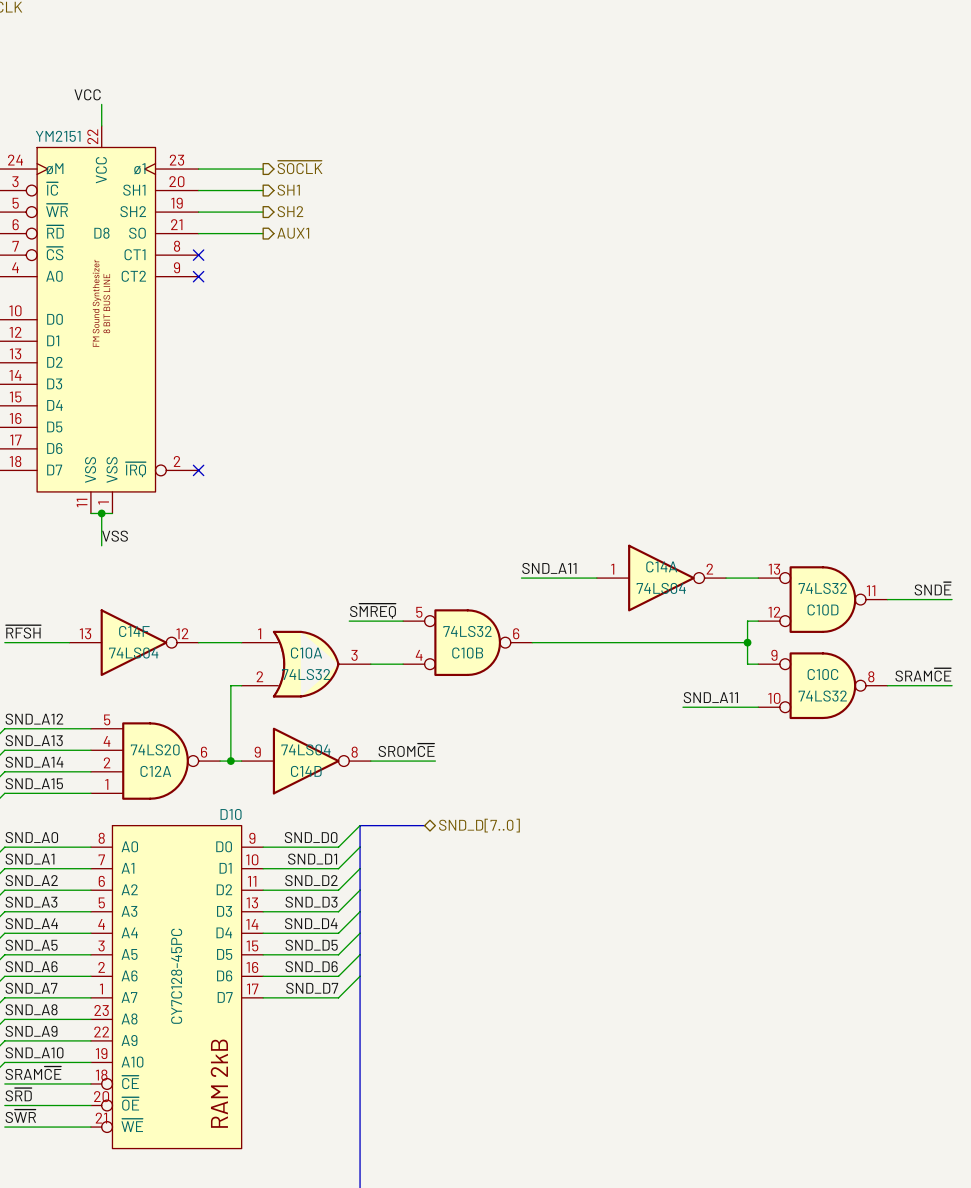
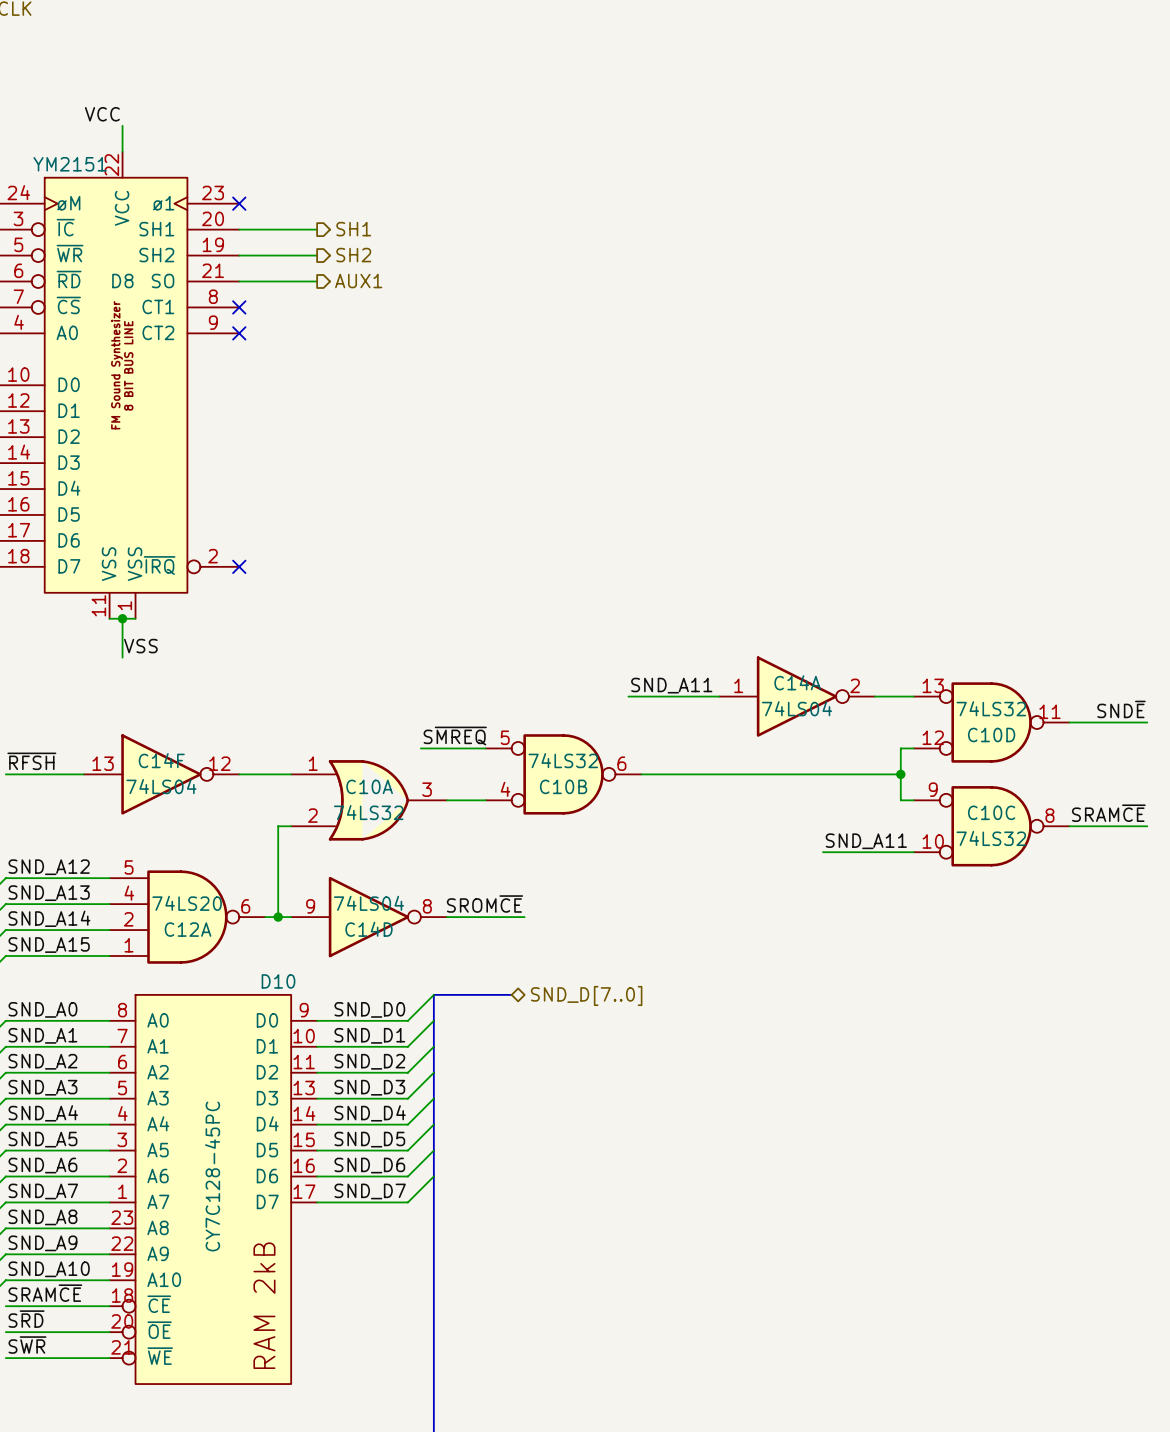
hierarchical label: ~{SOCLK} (300, 167) -> none
wire: (198, 169) (263, 169) -> none
no-connect mark: none -> (239, 203)

